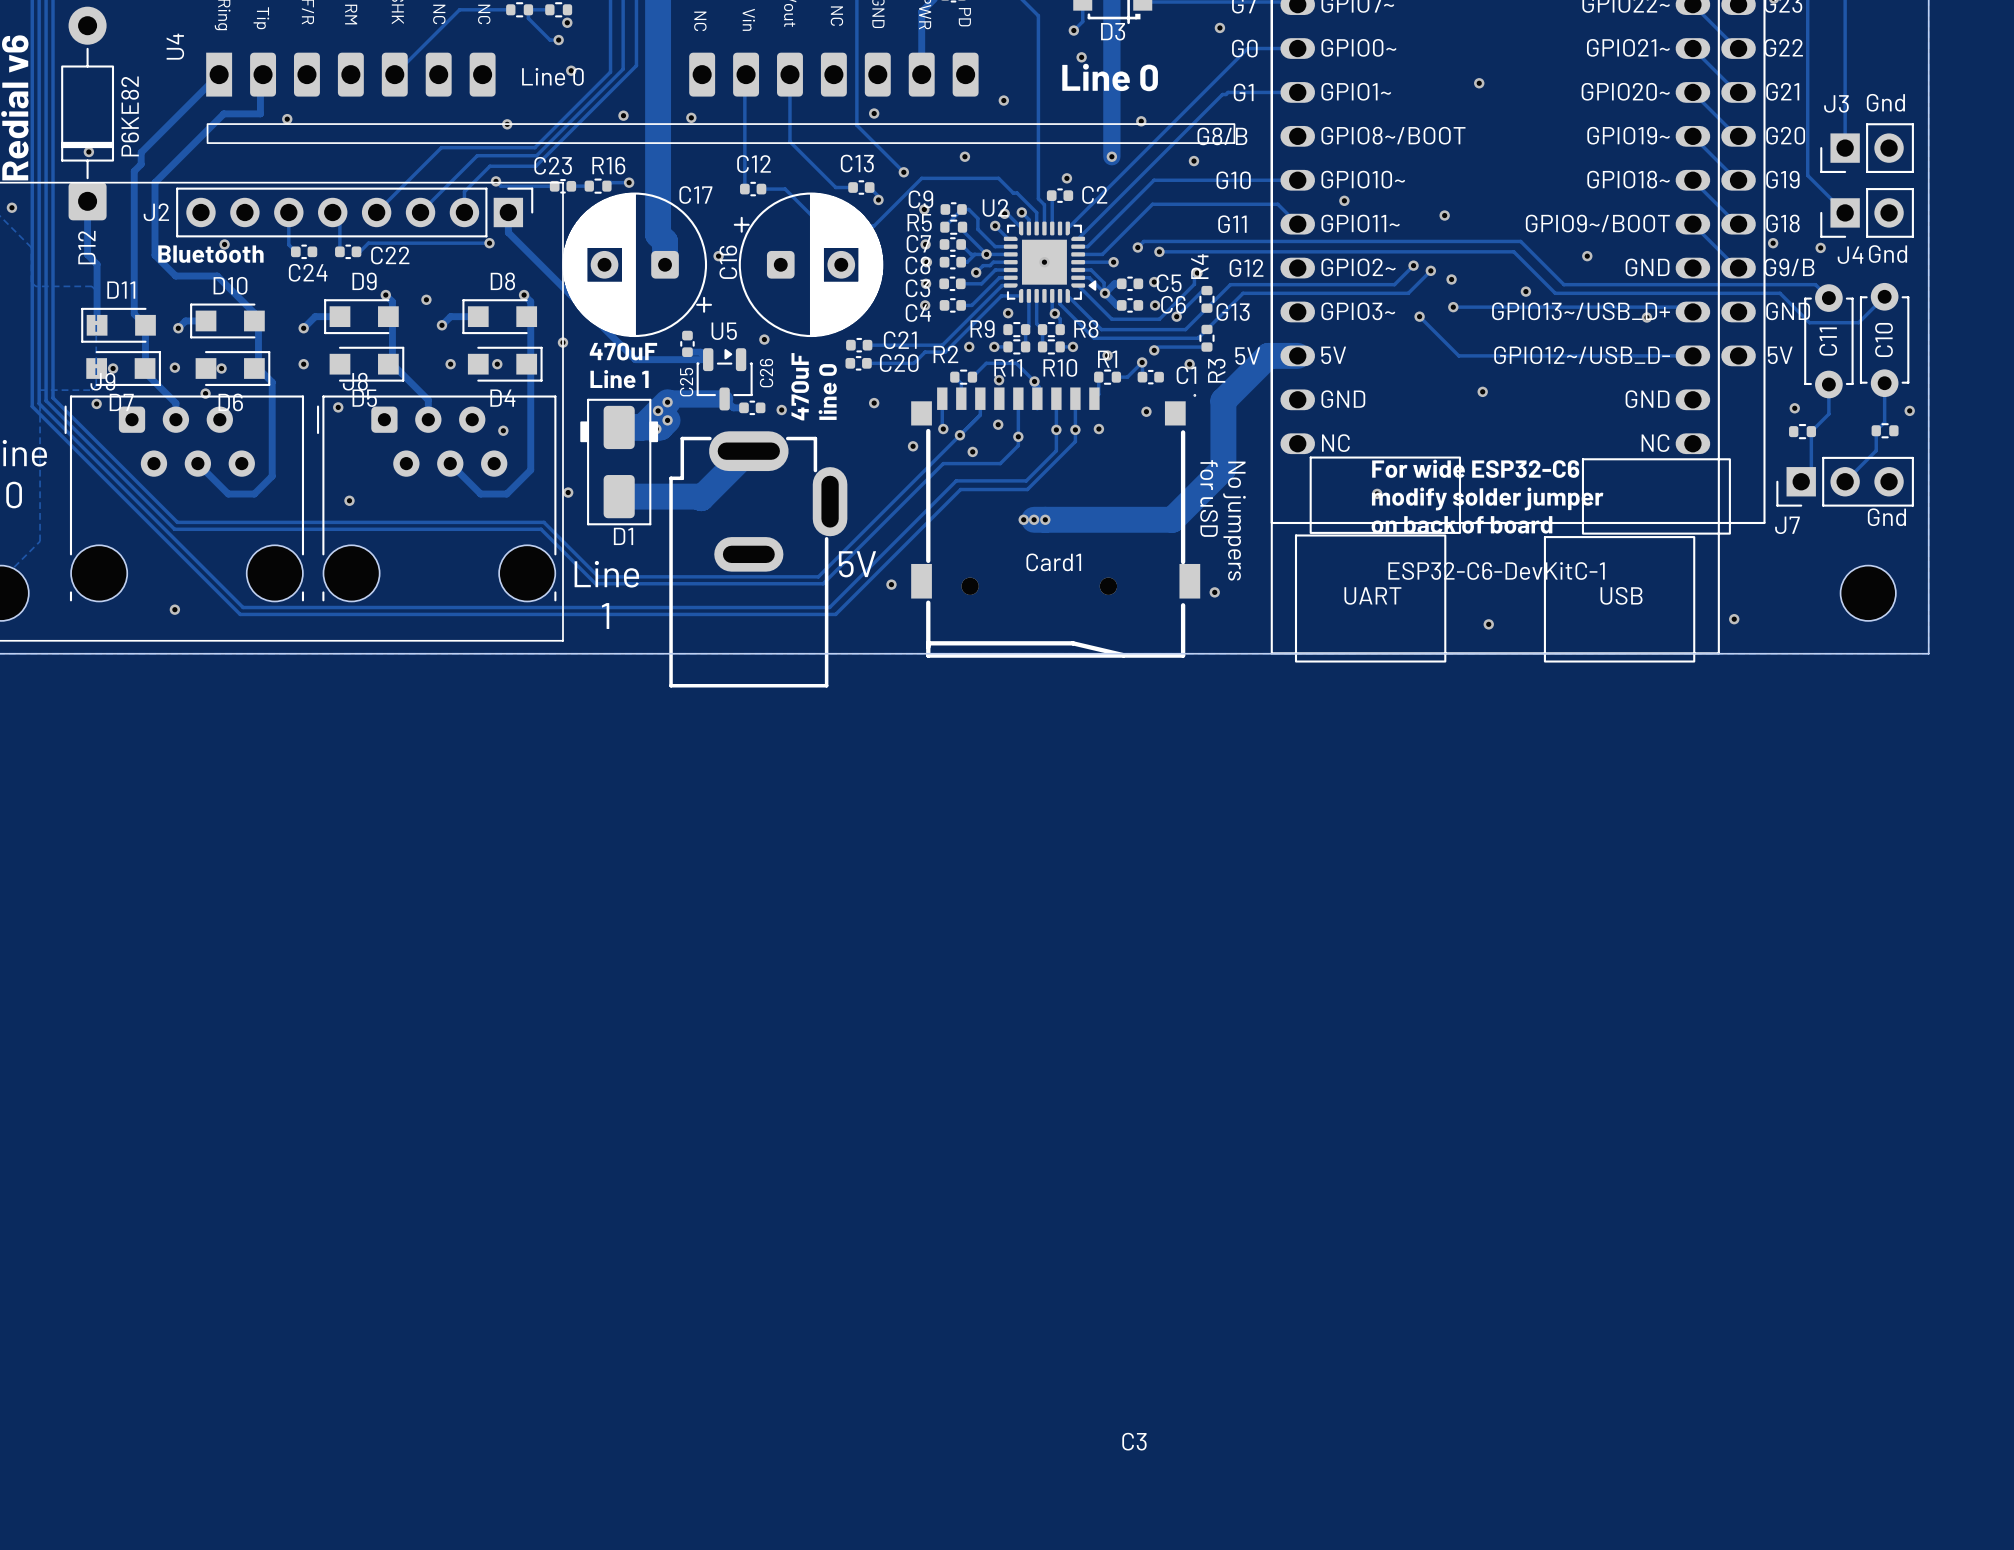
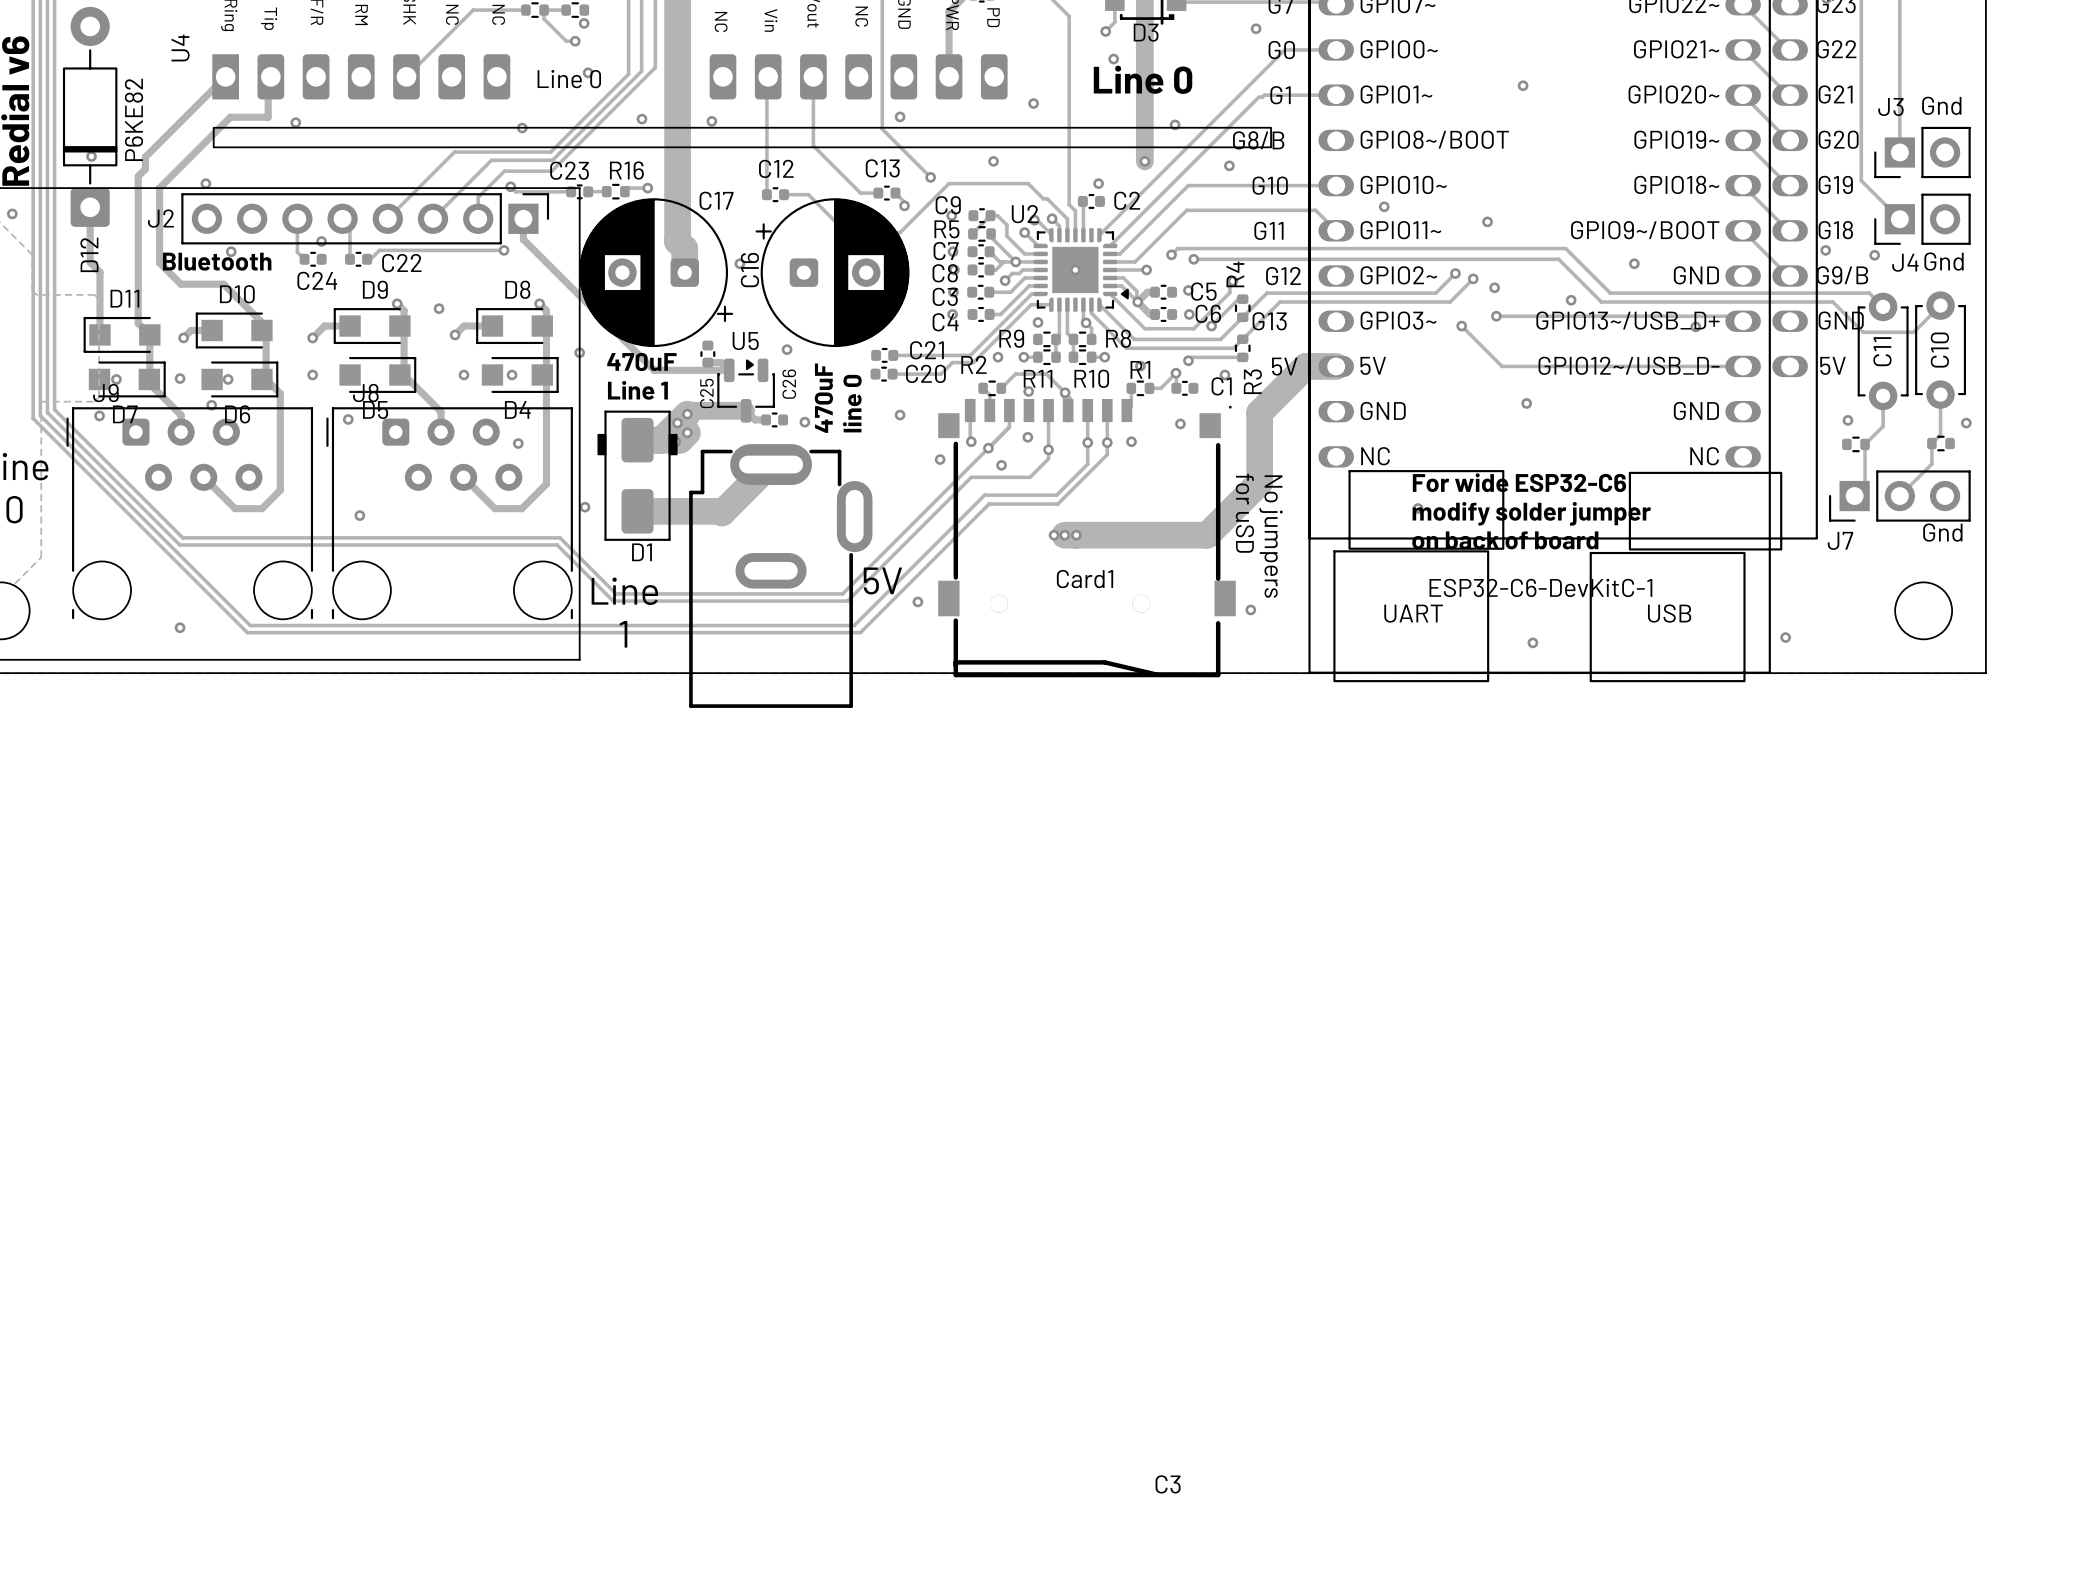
via: none -> (205, 183)
via: none -> (321, 241)

